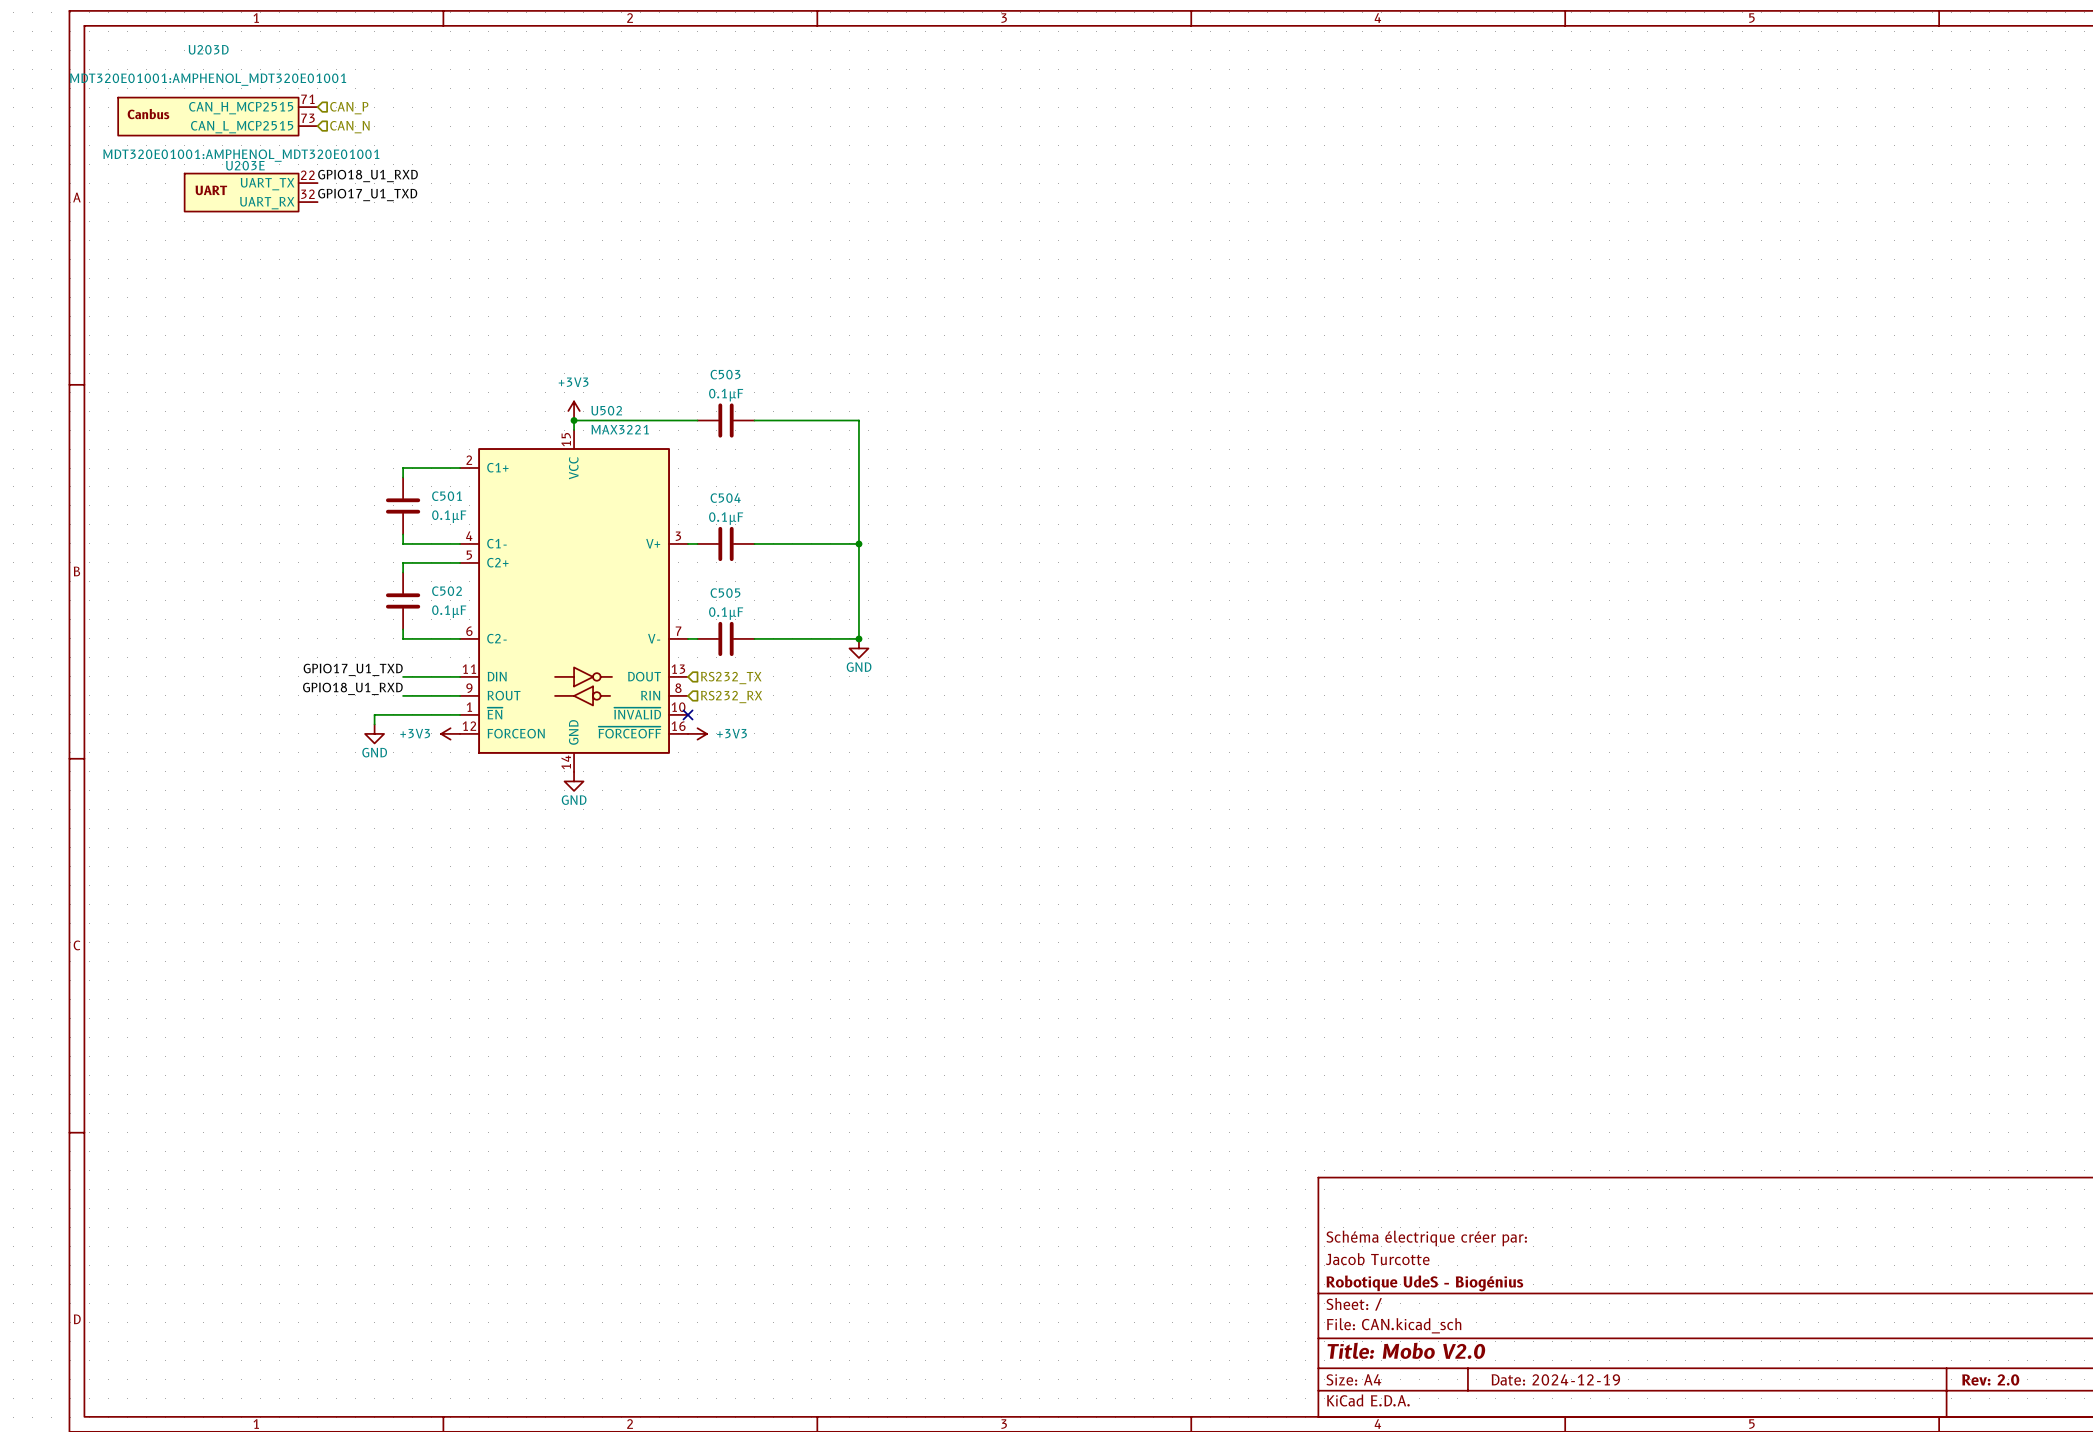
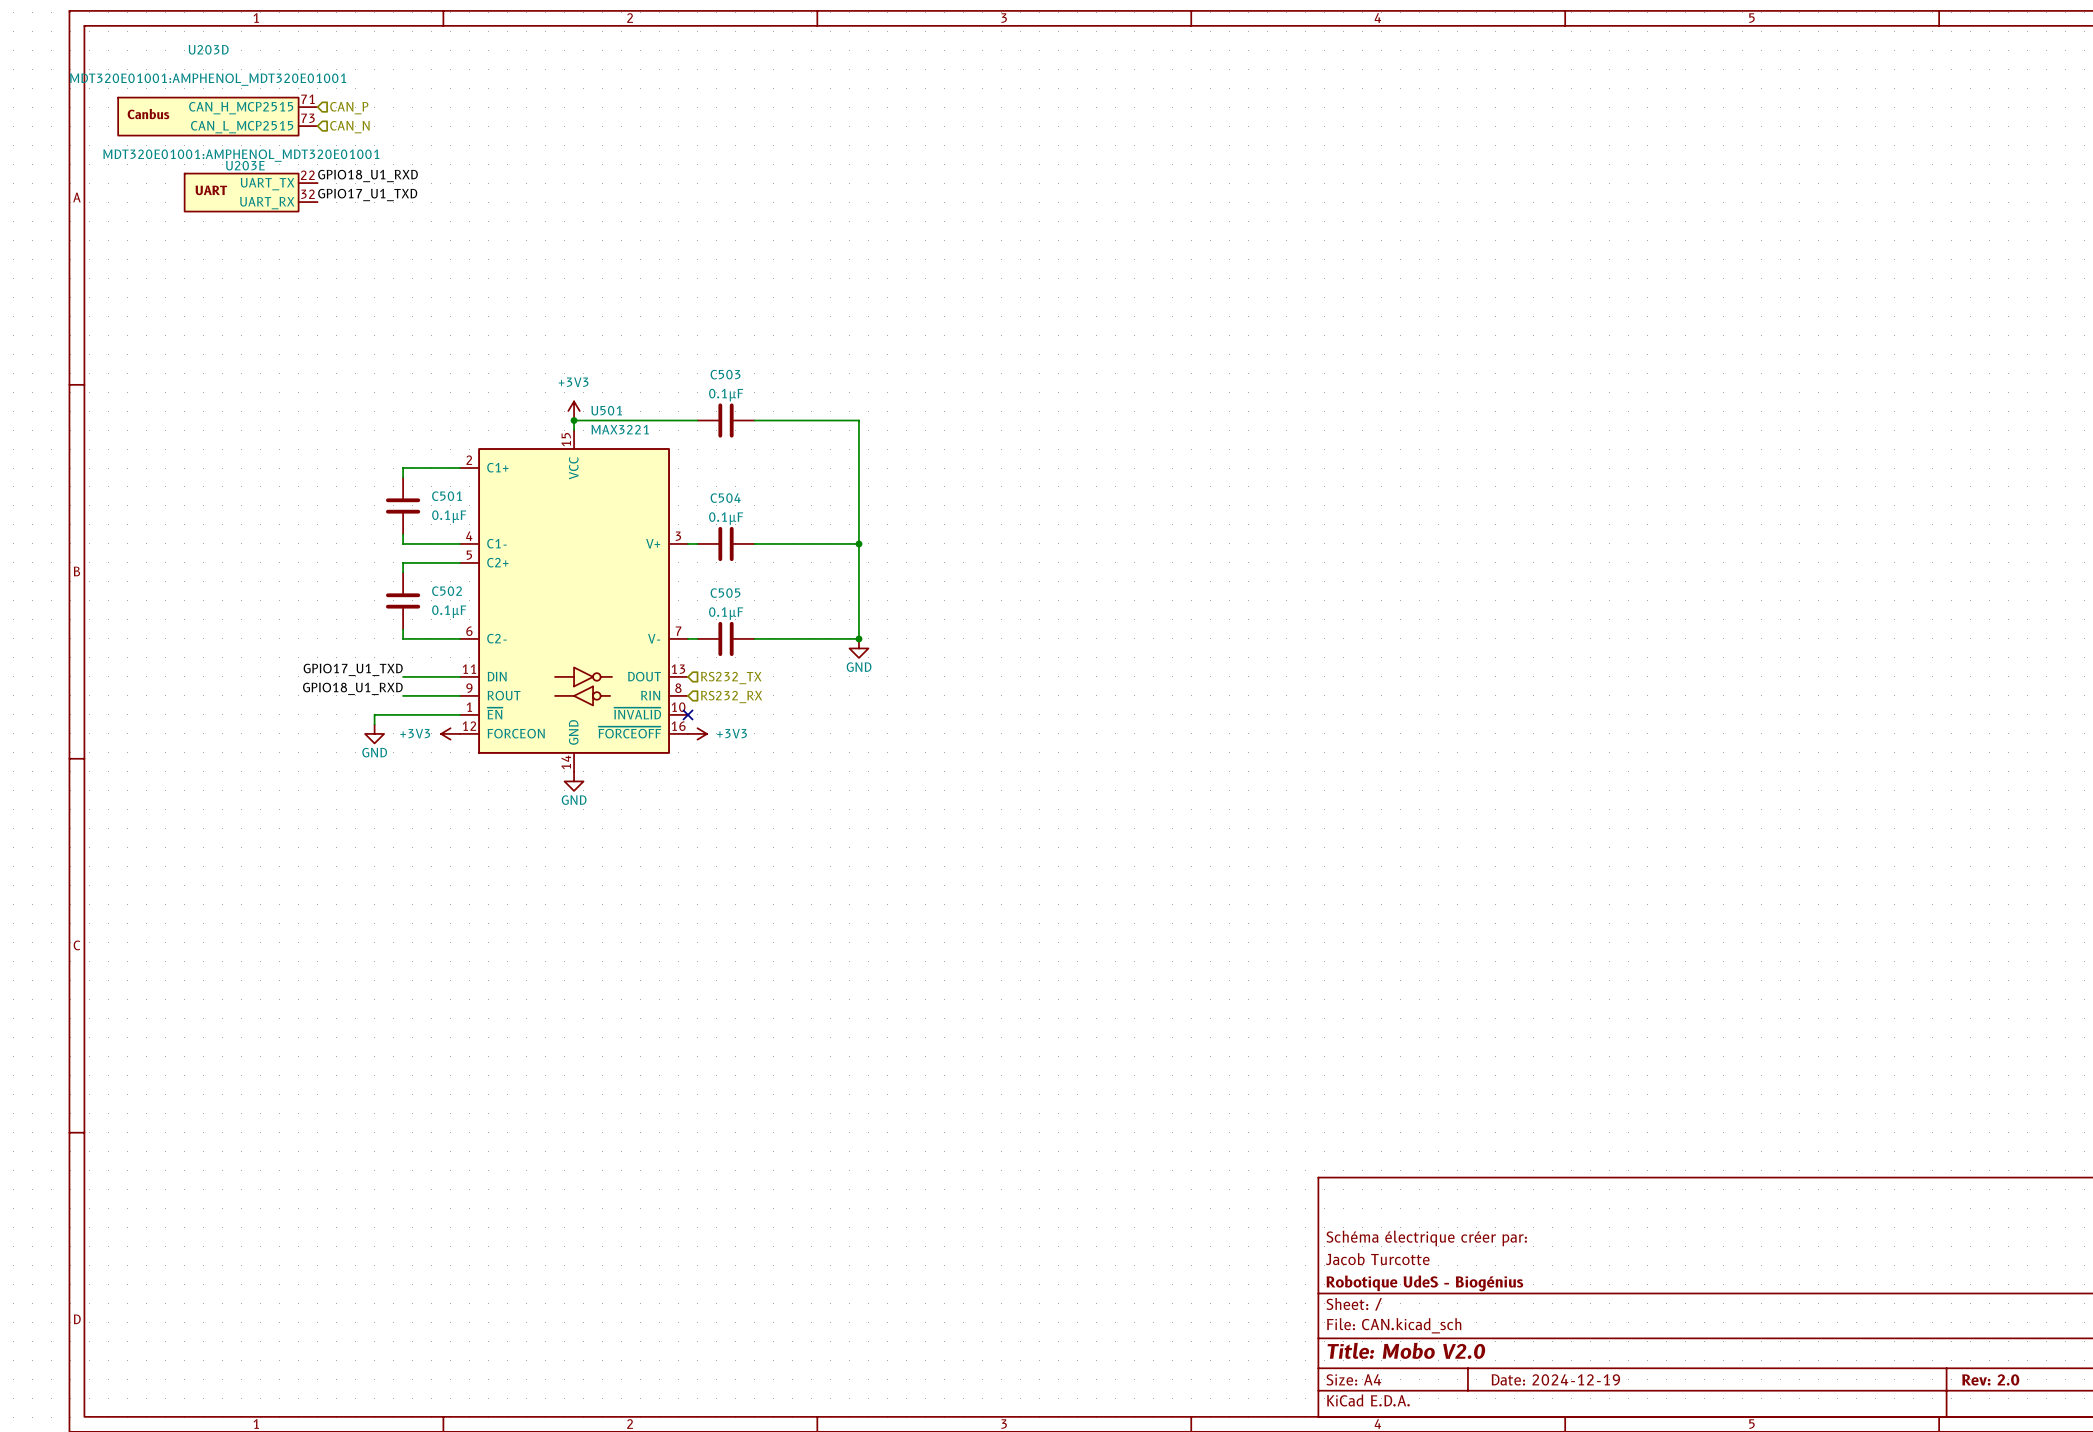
U502 name: U502 (606, 410) -> U501 (606, 410)

